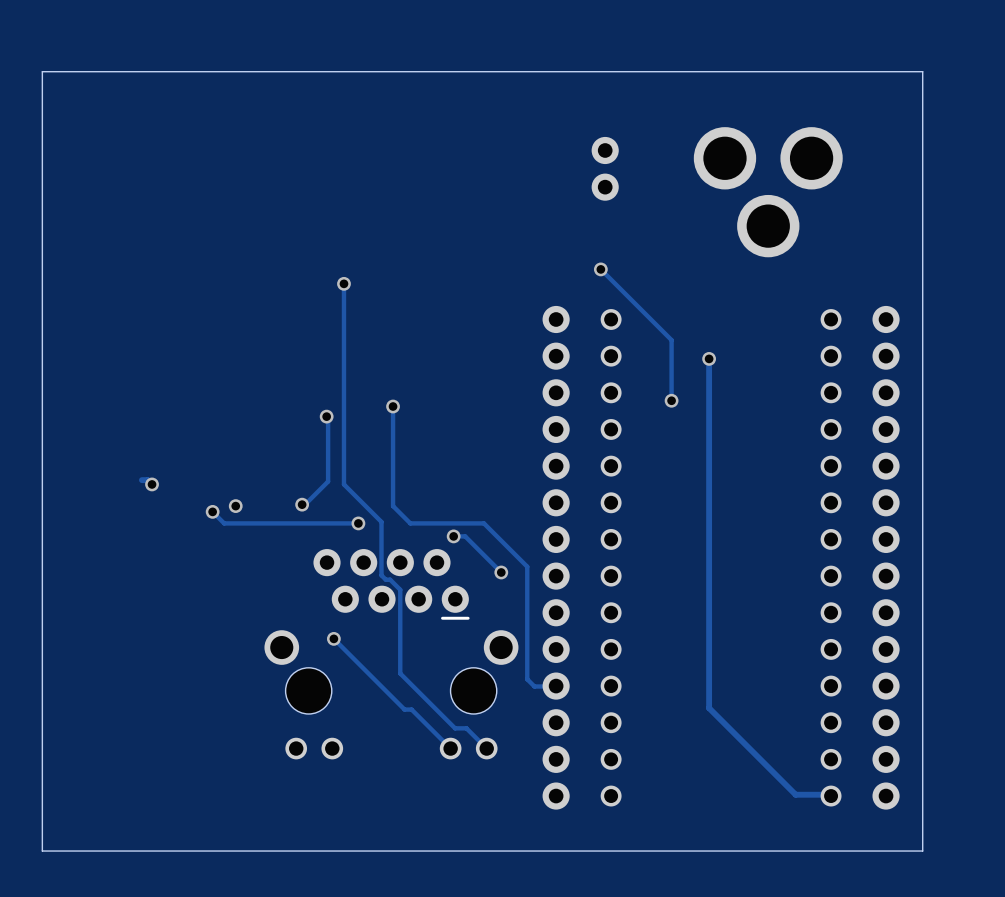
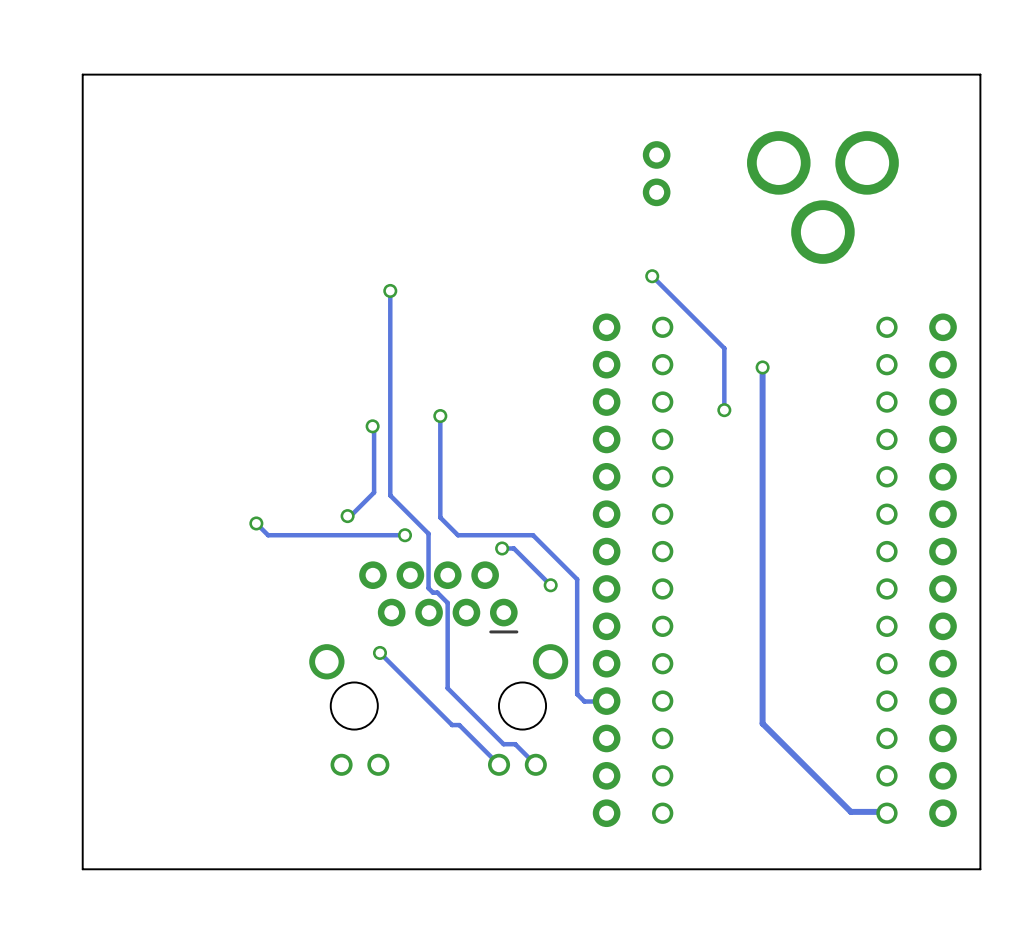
track: (141, 480) (147, 480) (152, 484) -> none
via: (152, 484) -> none
via: (235, 506) -> none

